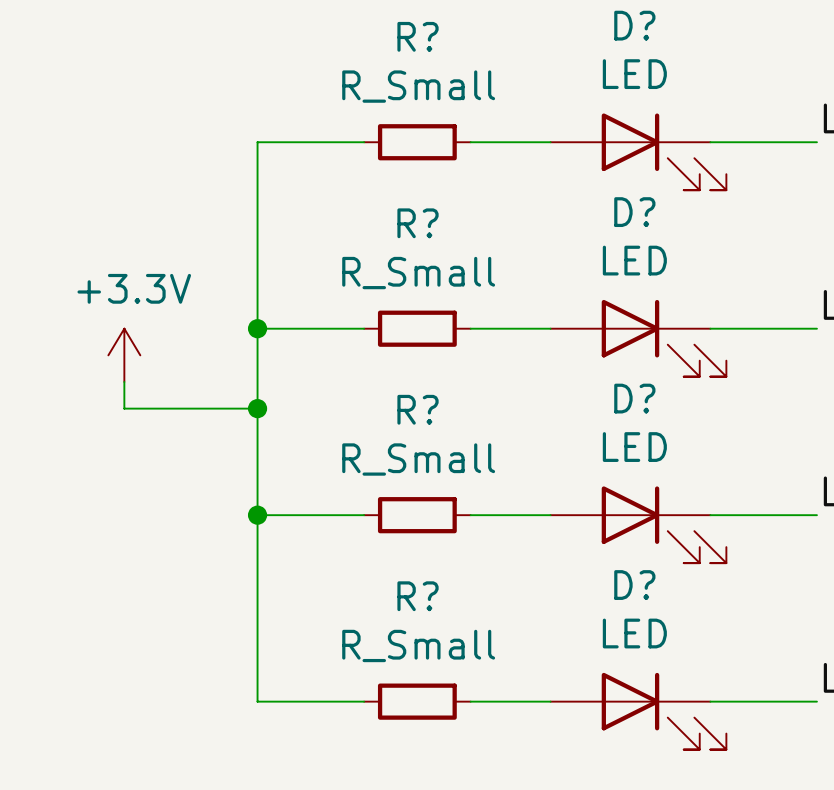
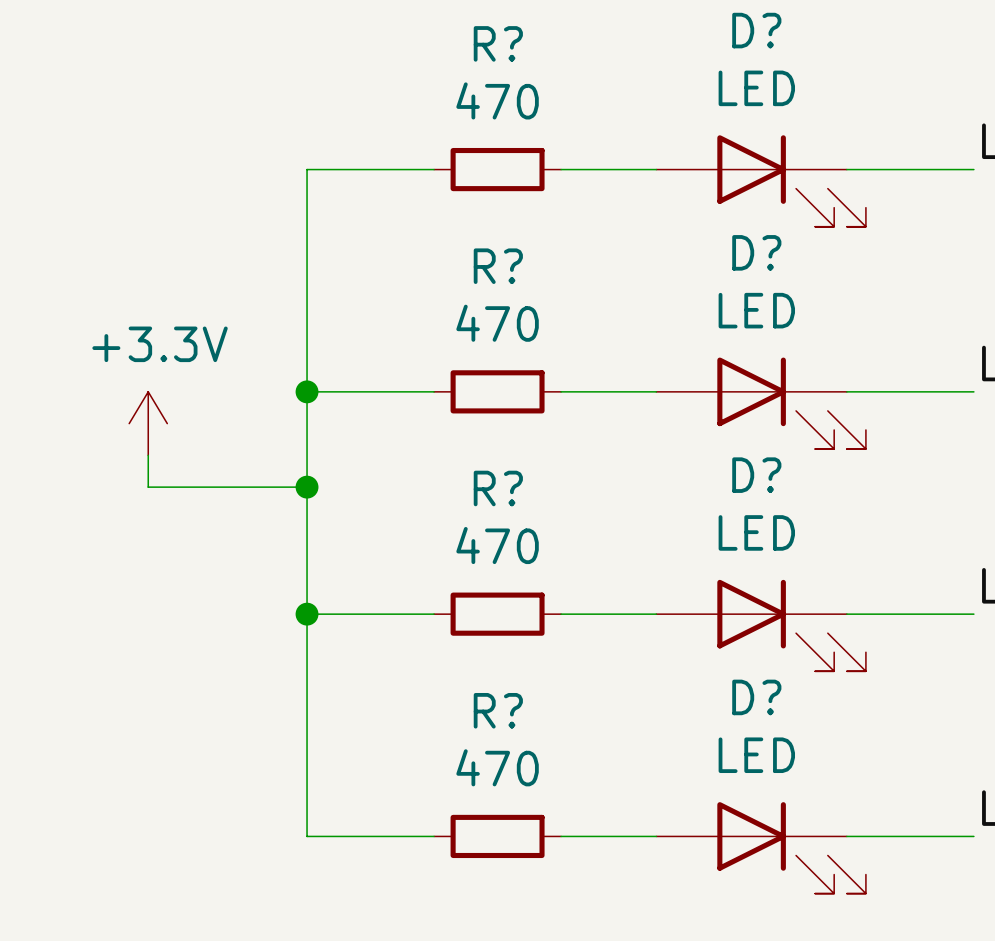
R? value: R_Small (418, 86) -> 470 (497, 100)
R? value: R_Small (418, 273) -> 470 (497, 323)
R? value: R_Small (418, 459) -> 470 (497, 545)
R? value: R_Small (418, 645) -> 470 (497, 767)

